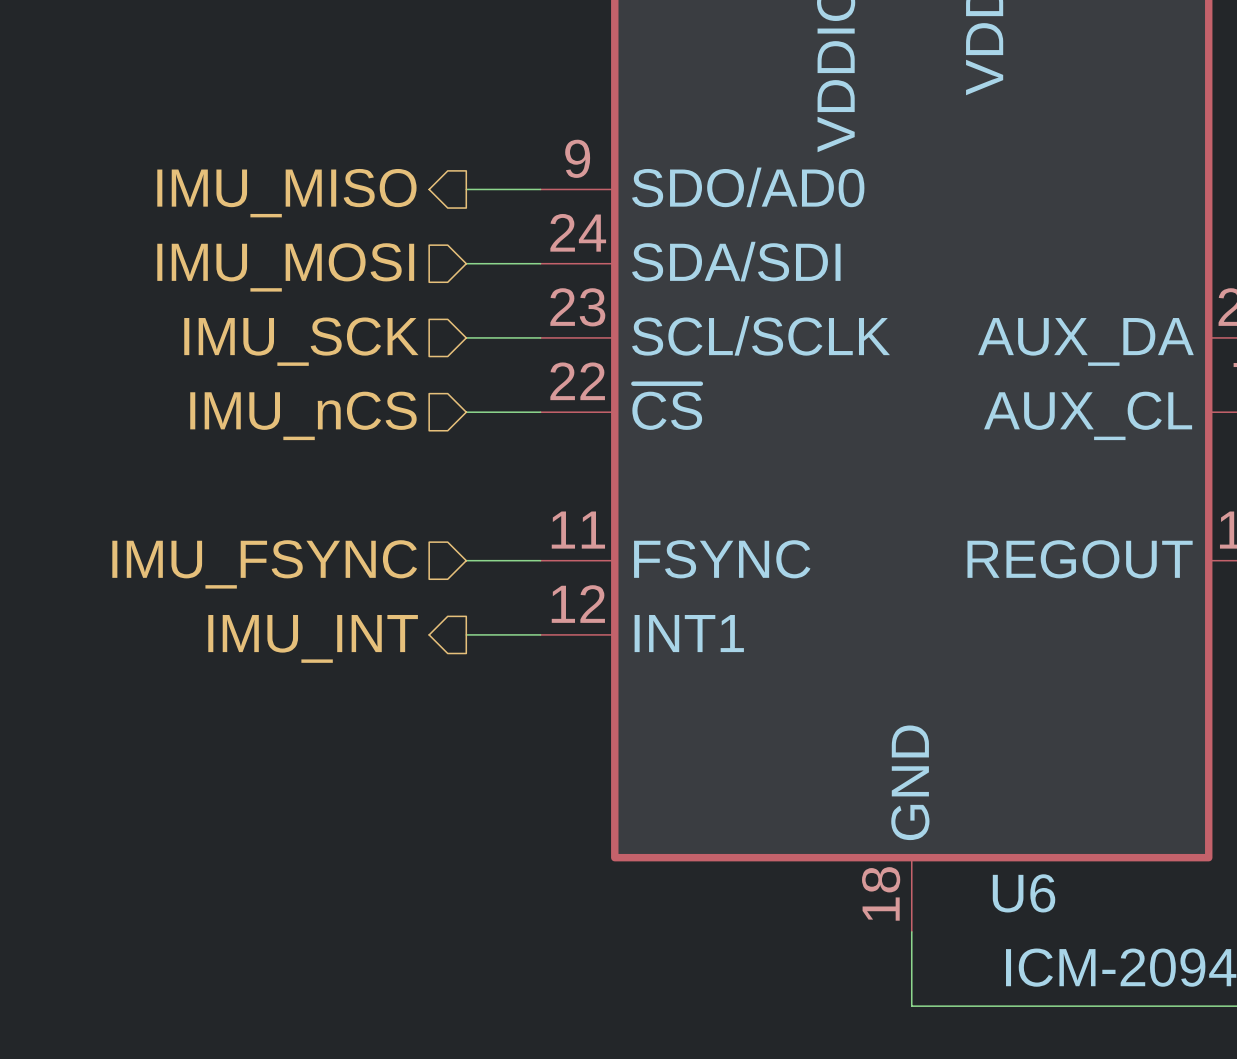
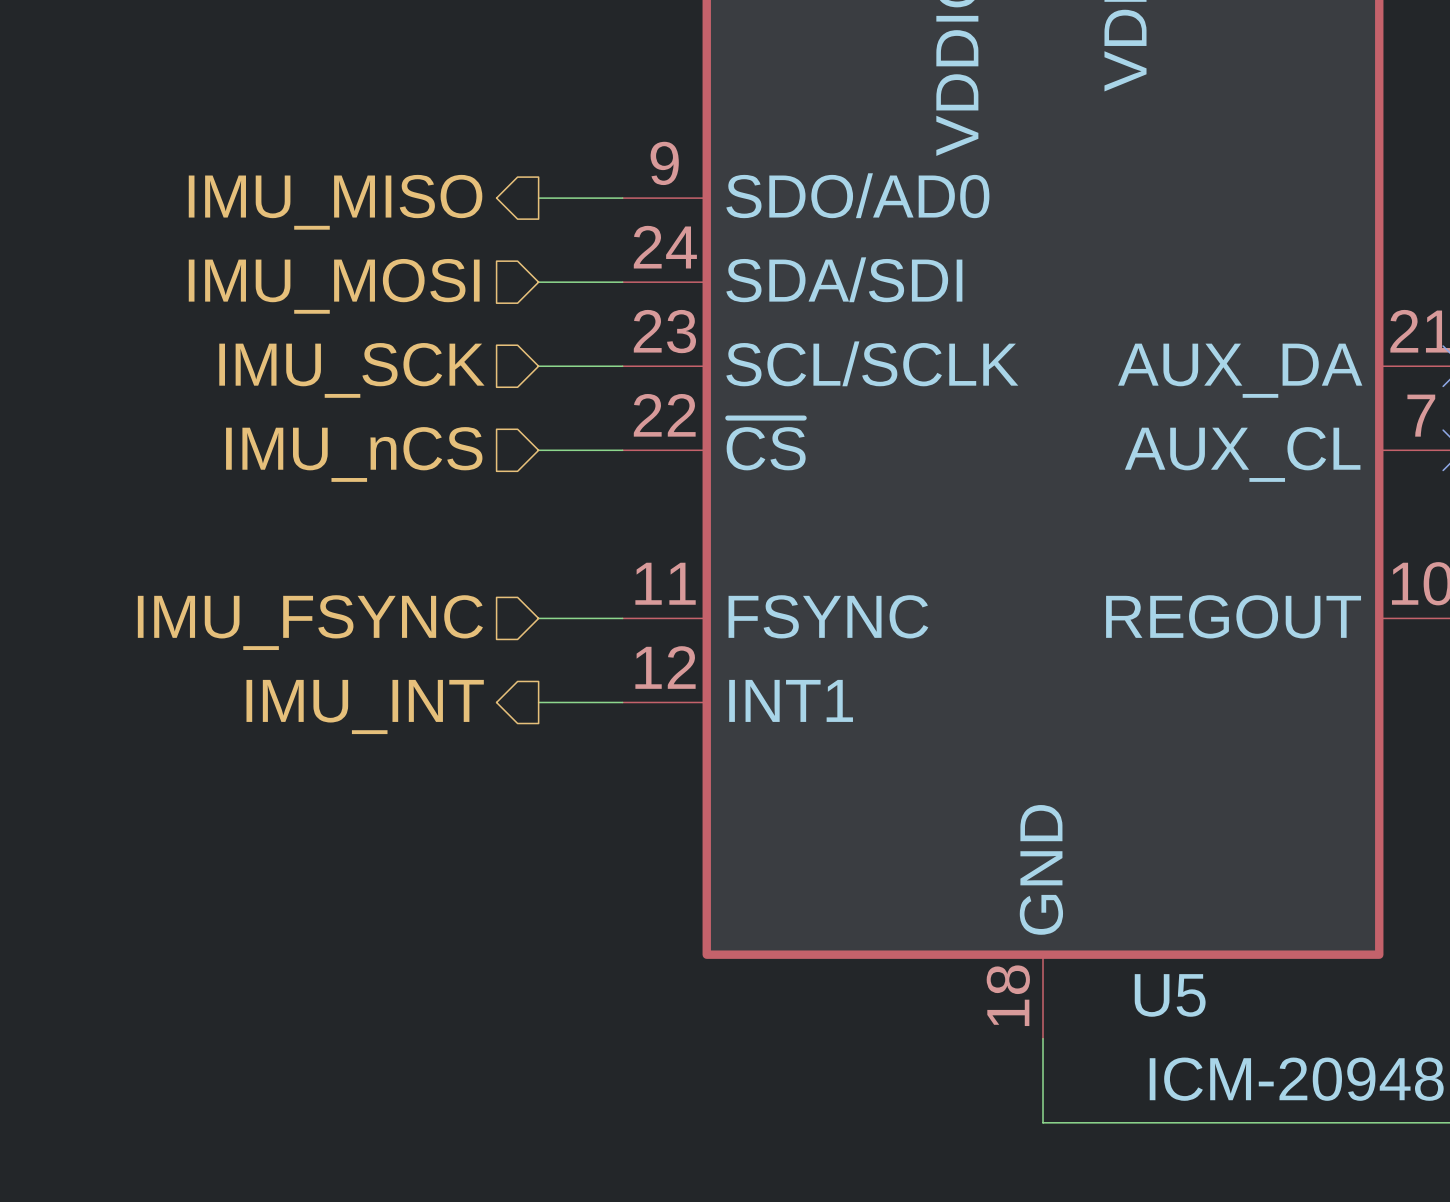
U6 name: U6 (1024, 893) -> U5 (1170, 995)

